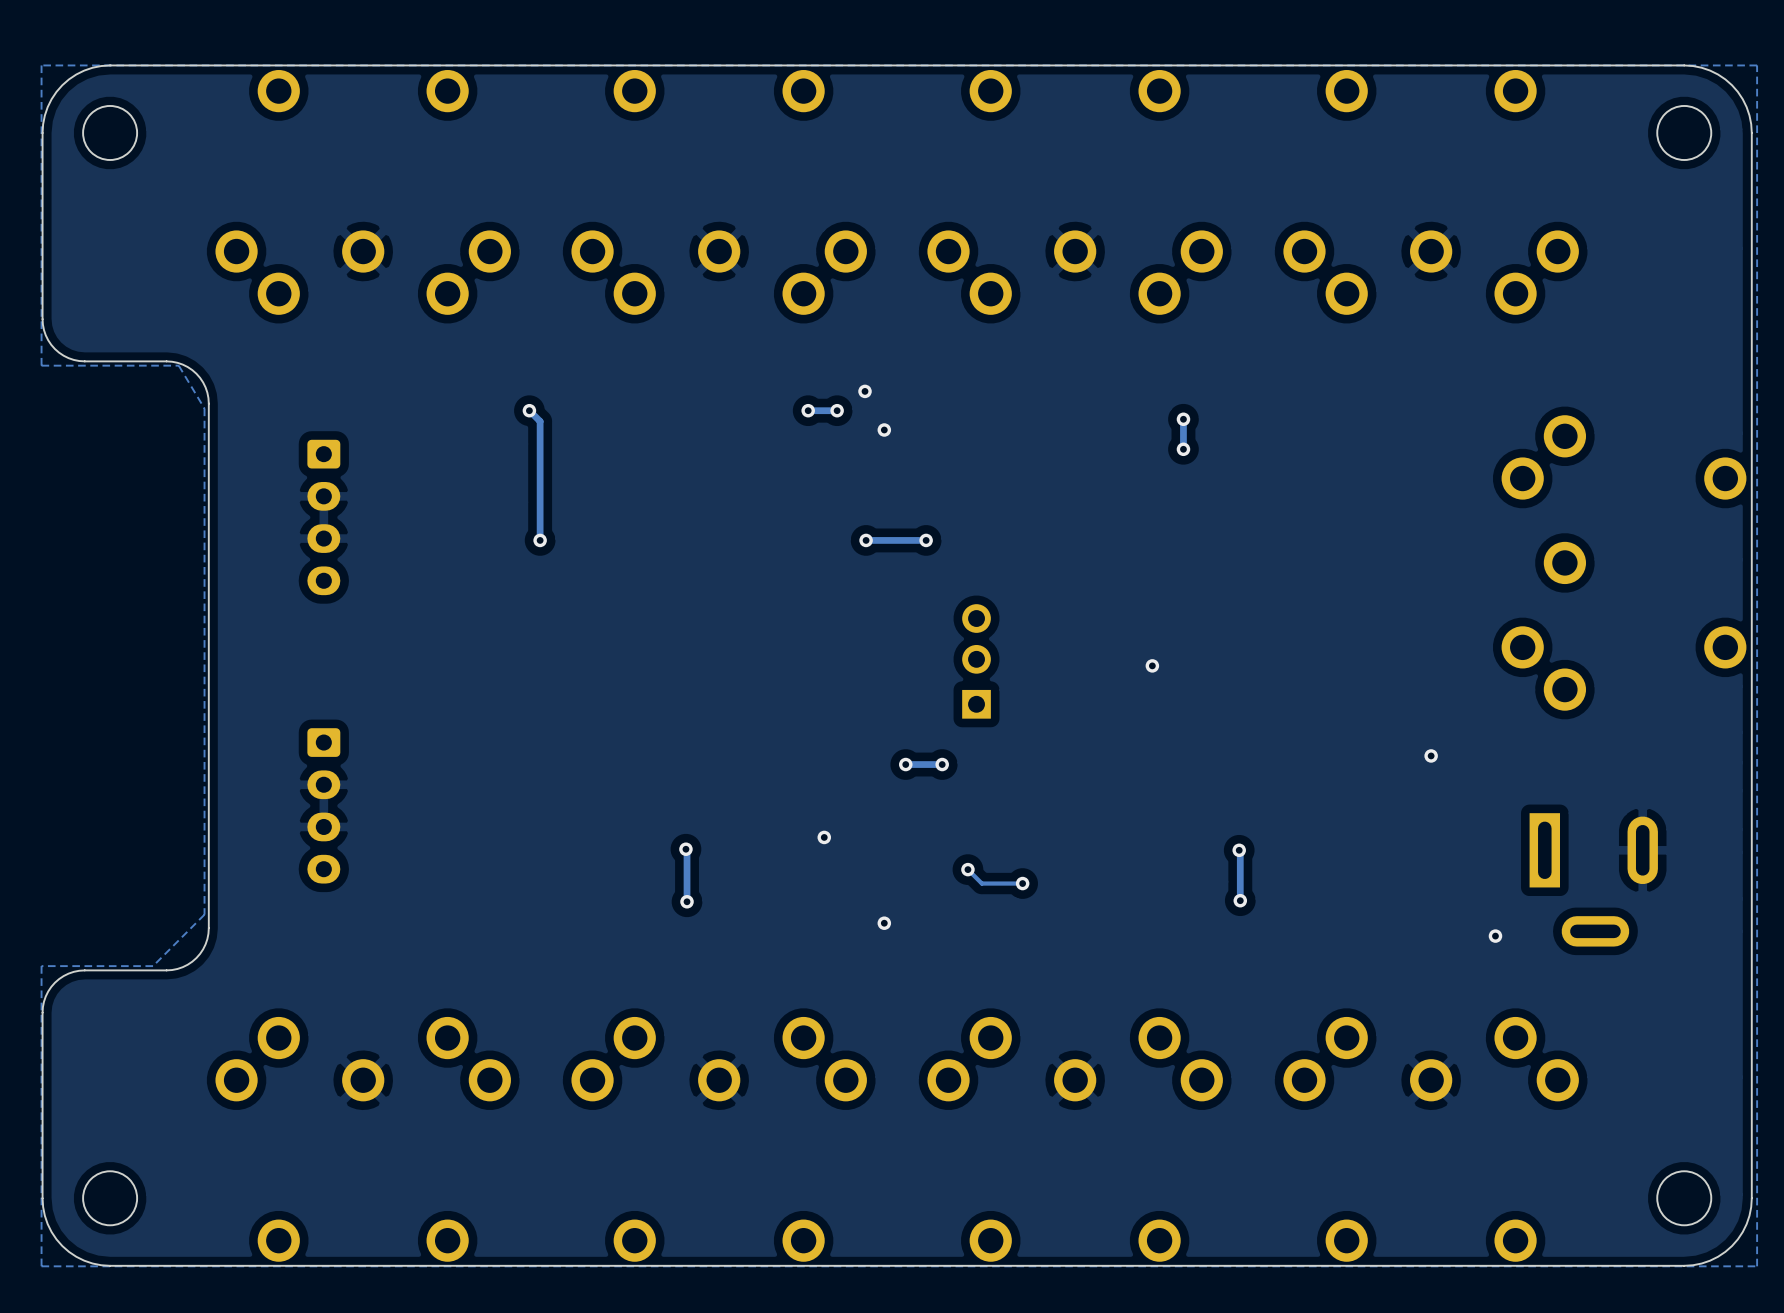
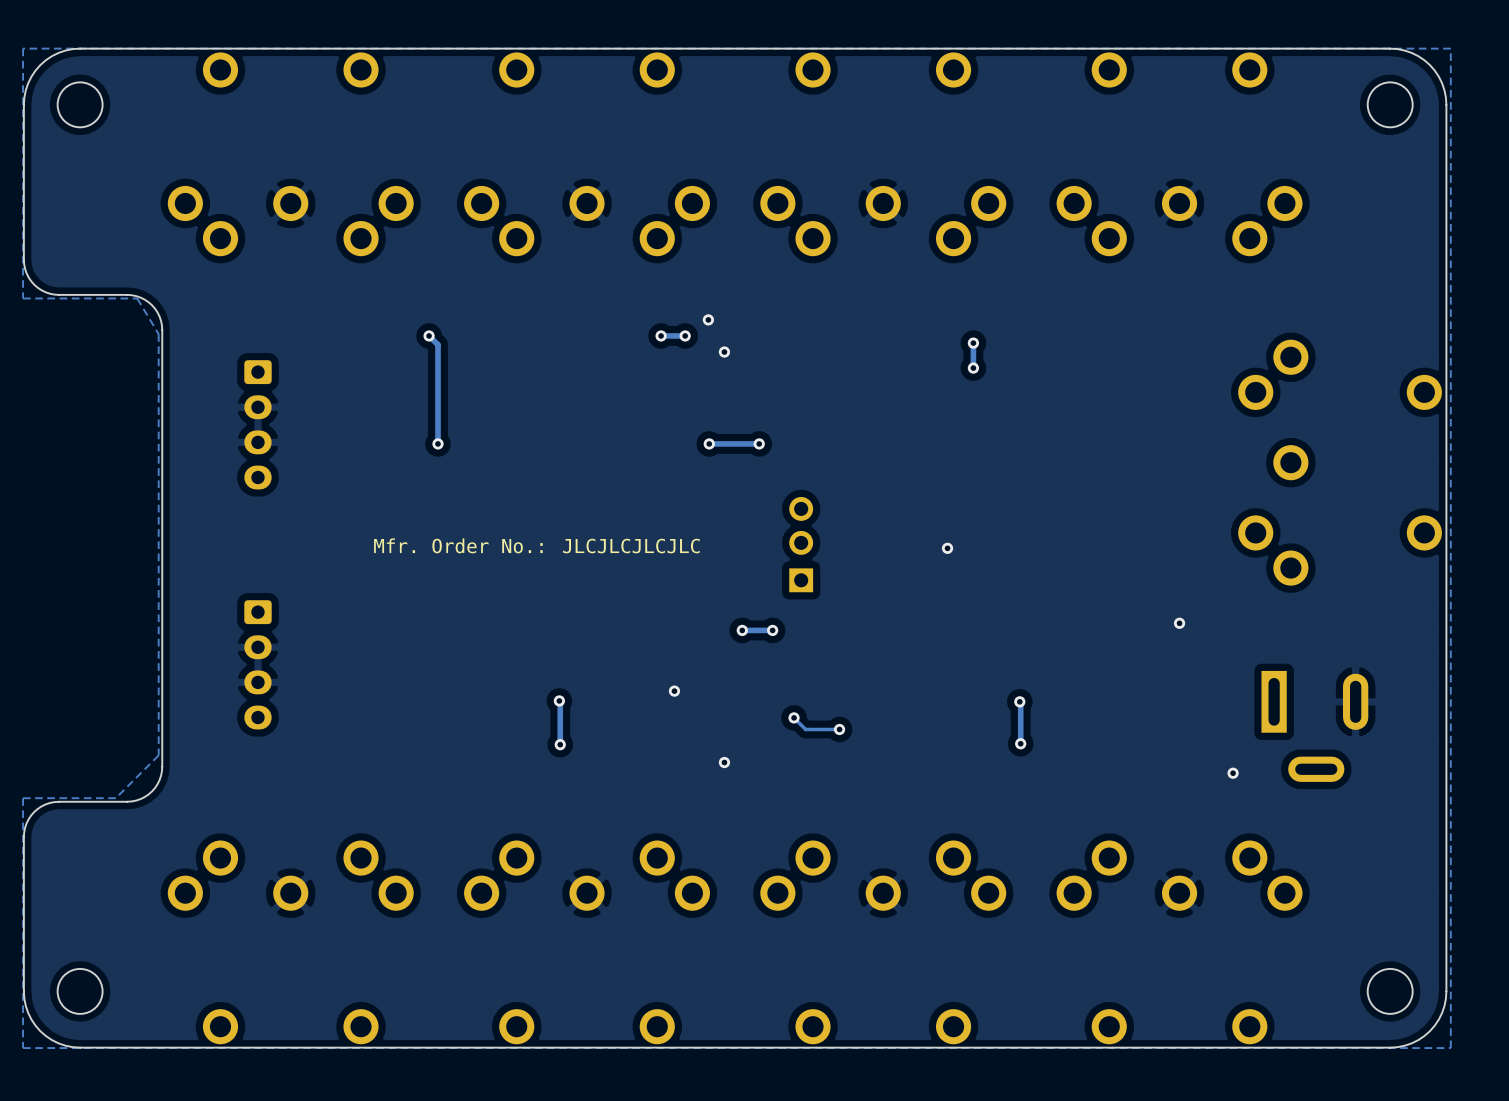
text: none -> Mfr. Order No.: (458, 545)
text: none -> JLCJLCJLCJLC (631, 546)

